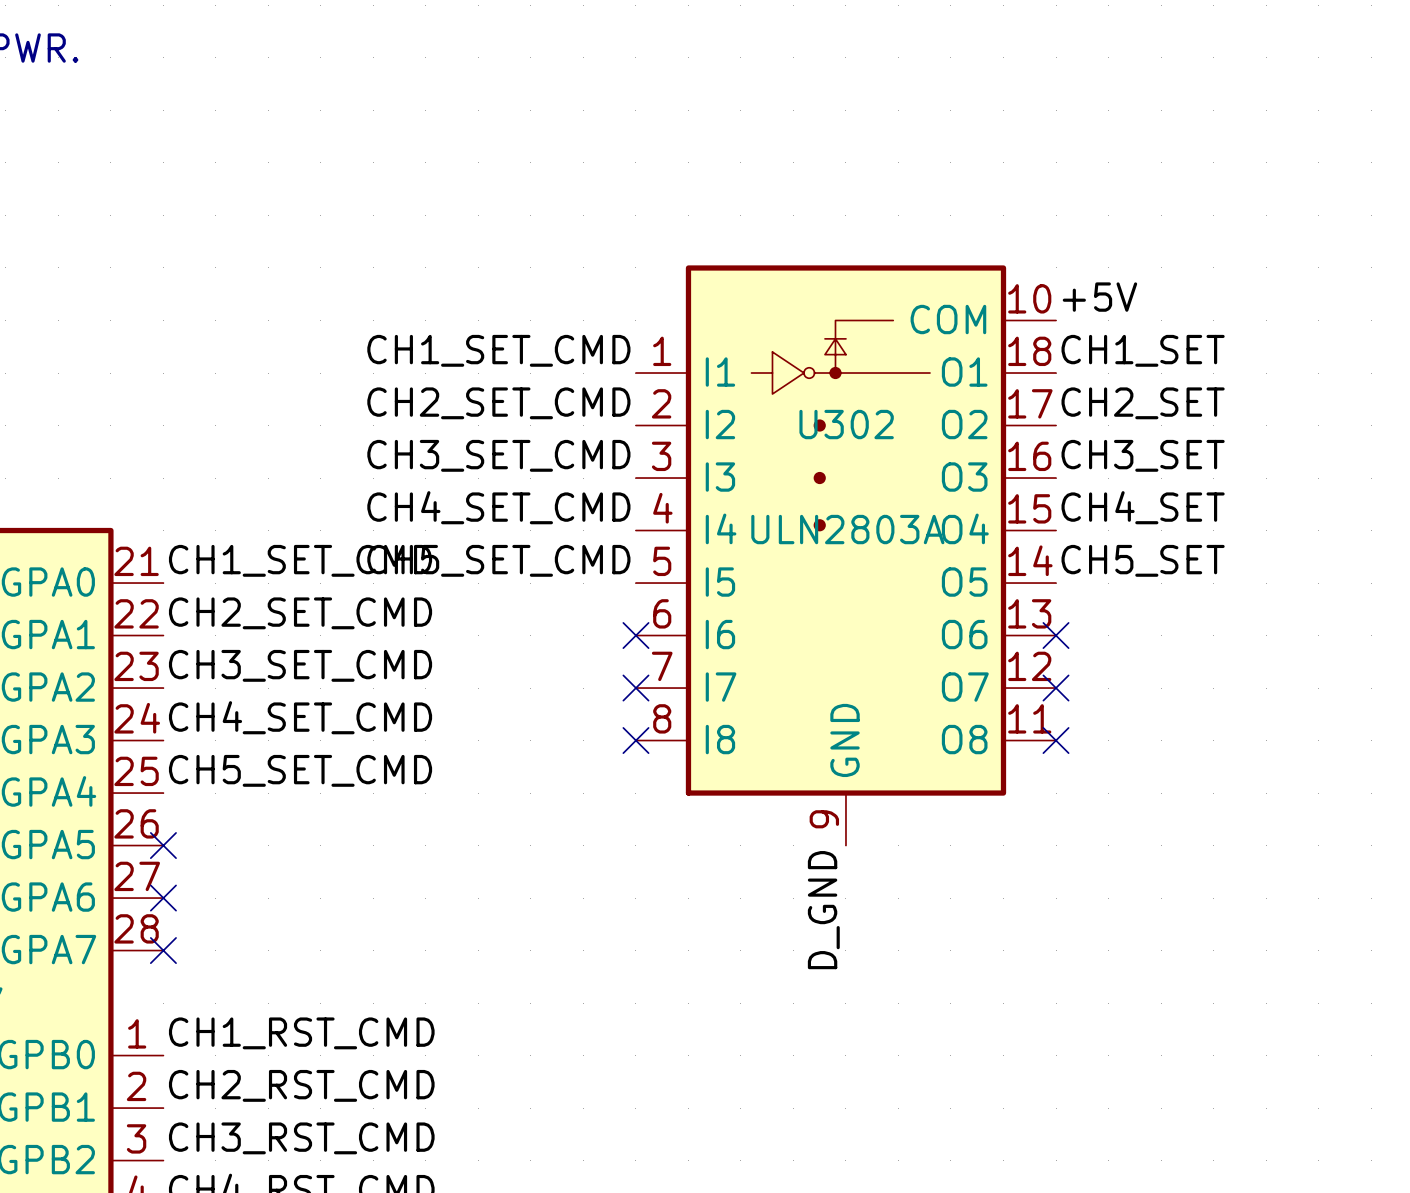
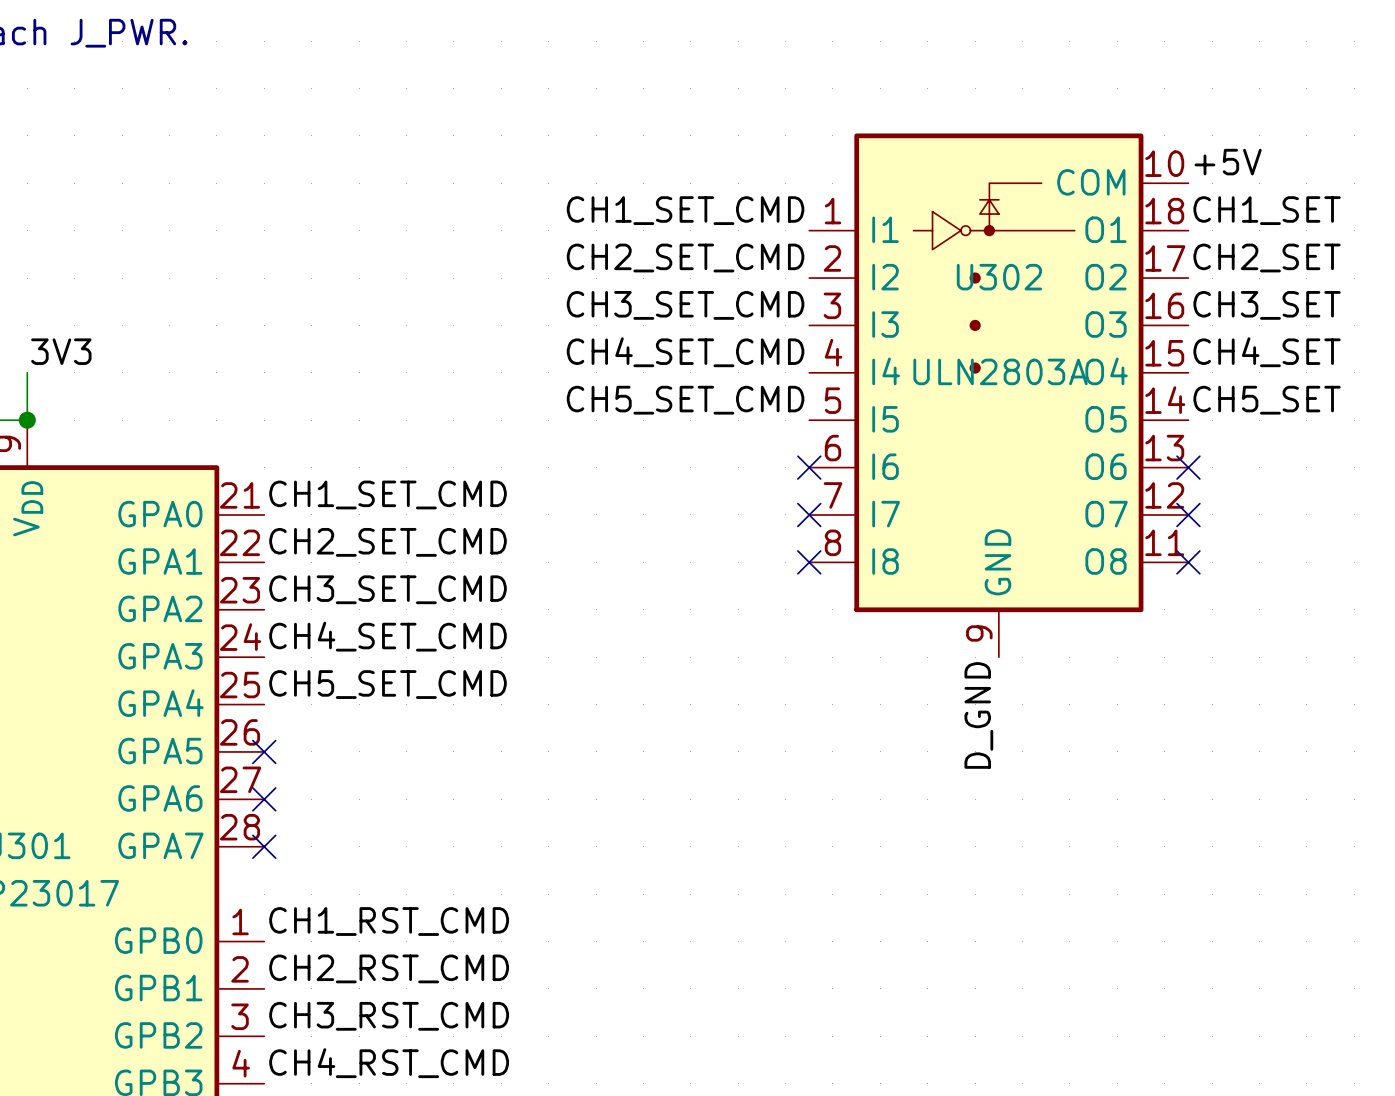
label position: +5V (1099, 297) -> +5V (1228, 162)
label position: CH1_SET_CMD (498, 350) -> CH1_SET_CMD (685, 210)
label position: CH1_SET (1143, 350) -> CH1_SET (1267, 210)
label position: CH2_SET_CMD (498, 403) -> CH2_SET_CMD (685, 258)
label position: CH2_SET (1143, 403) -> CH2_SET (1267, 258)
label position: CH3_SET_CMD (498, 455) -> CH3_SET_CMD (685, 305)
label position: CH3_SET (1143, 455) -> CH3_SET (1267, 305)
label position: CH4_SET_CMD (498, 507) -> CH4_SET_CMD (685, 352)
label position: CH4_SET (1143, 507) -> CH4_SET (1267, 352)
no-connect mark: none -> (809, 467)
no-connect mark: none -> (1188, 467)
U302 position: (845, 555) -> (998, 395)
label position: CH5_SET_CMD (498, 560) -> CH5_SET_CMD (685, 400)
label position: CH5_SET (1143, 560) -> CH5_SET (1267, 400)
no-connect mark: none -> (809, 514)
no-connect mark: none -> (1188, 514)
no-connect mark: (635, 635) -> none
no-connect mark: none -> (809, 562)
no-connect mark: (1056, 635) -> none
no-connect mark: none -> (1188, 562)
no-connect mark: (635, 688) -> none
no-connect mark: (1056, 688) -> none
no-connect mark: (635, 740) -> none
no-connect mark: (1056, 740) -> none
label position: D_GND (823, 910) -> D_GND (978, 715)

